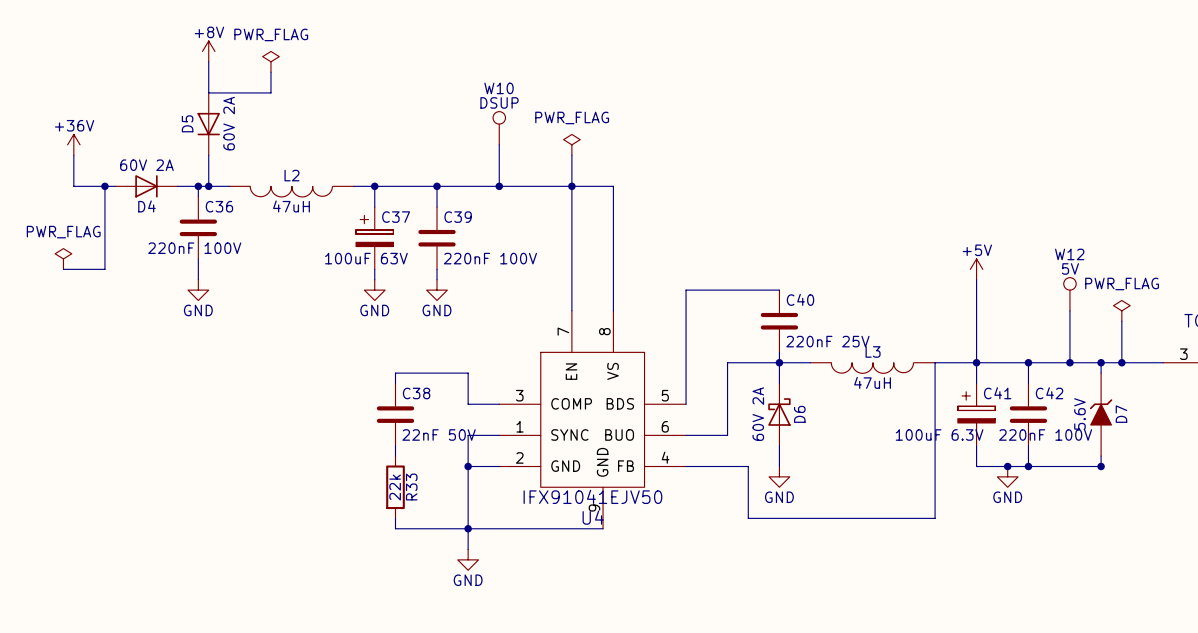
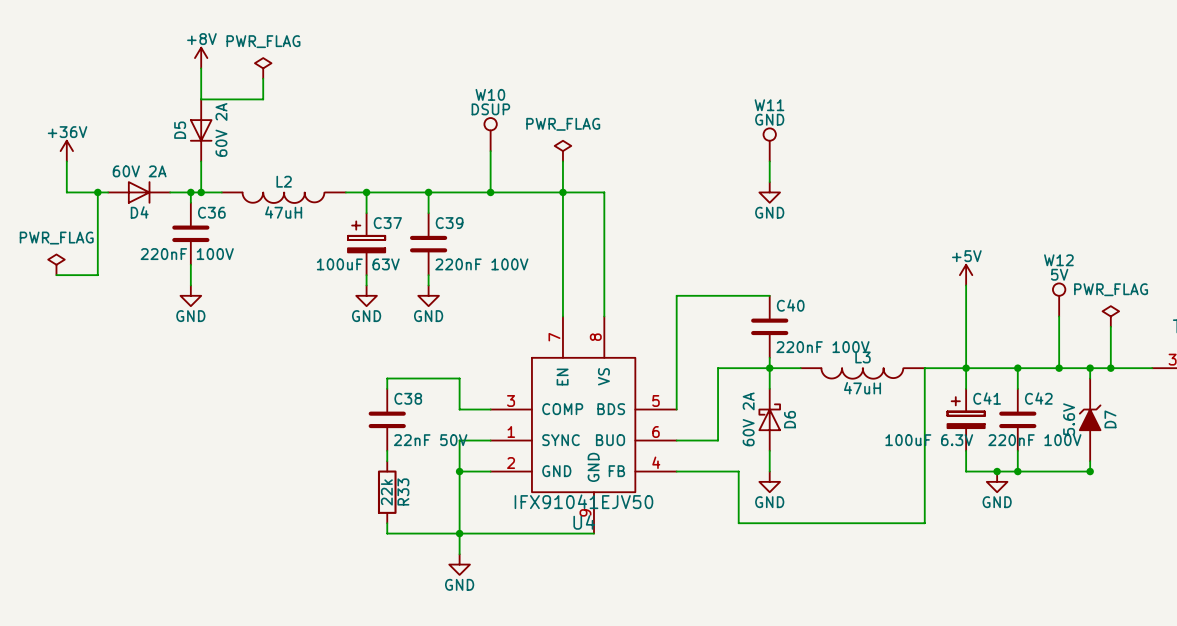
W11: none -> GND (769, 144)
wire: none -> (769, 161) (769, 182)
power symbol: none -> GND (769, 192)
C40 value: 220nF 25V (827, 341) -> 220nF 100V (822, 347)

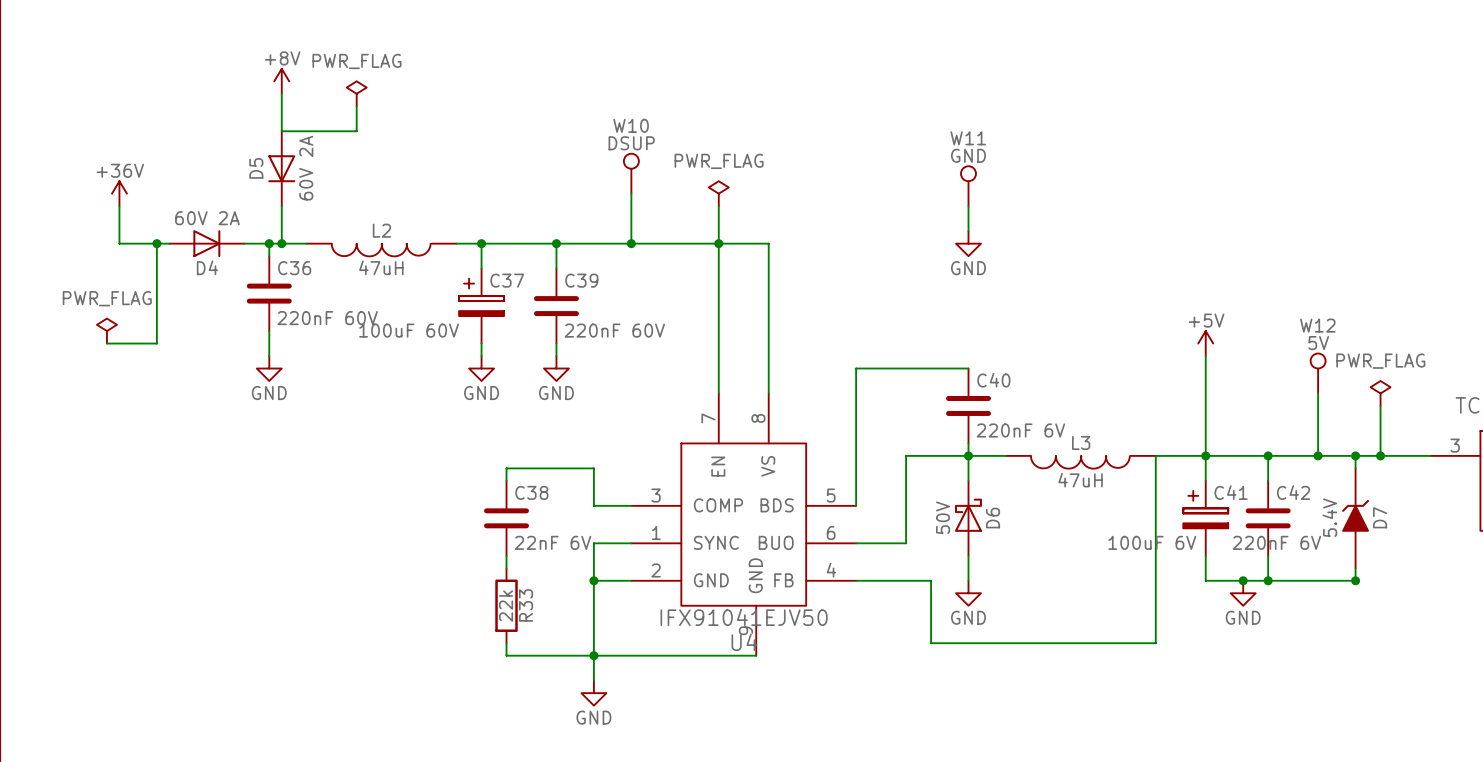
C36 value: 220nF 100V (187, 254) -> 220nF 60V (327, 318)
C37 value: 100uF 63V (358, 264) -> 100uF 60V (409, 330)
C39 value: 220nF 100V (481, 264) -> 220nF 60V (614, 330)
C40 value: 220nF 100V (822, 347) -> 220nF 6V (1020, 430)
D6 value: 60V 2A (748, 419) -> 50V (943, 517)
D7 value: 5.6V (1069, 419) -> 5.4V (1329, 517)
C38 value: 22nF 50V (430, 440) -> 22nF 6V (552, 542)
C41 value: 100uF 6.3V (929, 440) -> 100uF 6V (1152, 542)
C42 value: 220nF 100V (1034, 440) -> 220nF 6V (1276, 542)

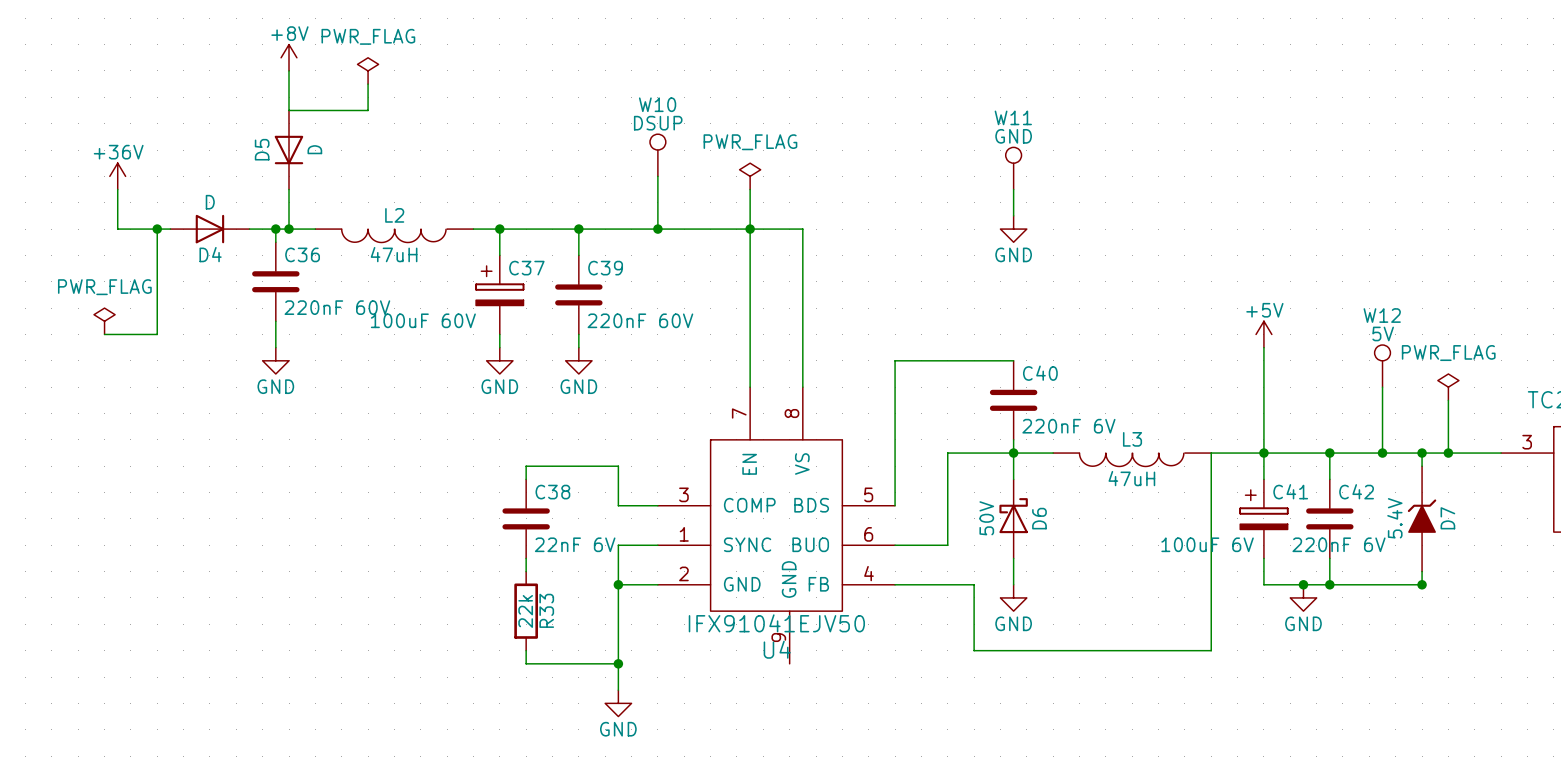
D5 value: 60V 2A (306, 168) -> D (314, 149)
D4 value: 60V 2A (207, 218) -> D (210, 202)
wire: (593, 655) (756, 655) -> none

